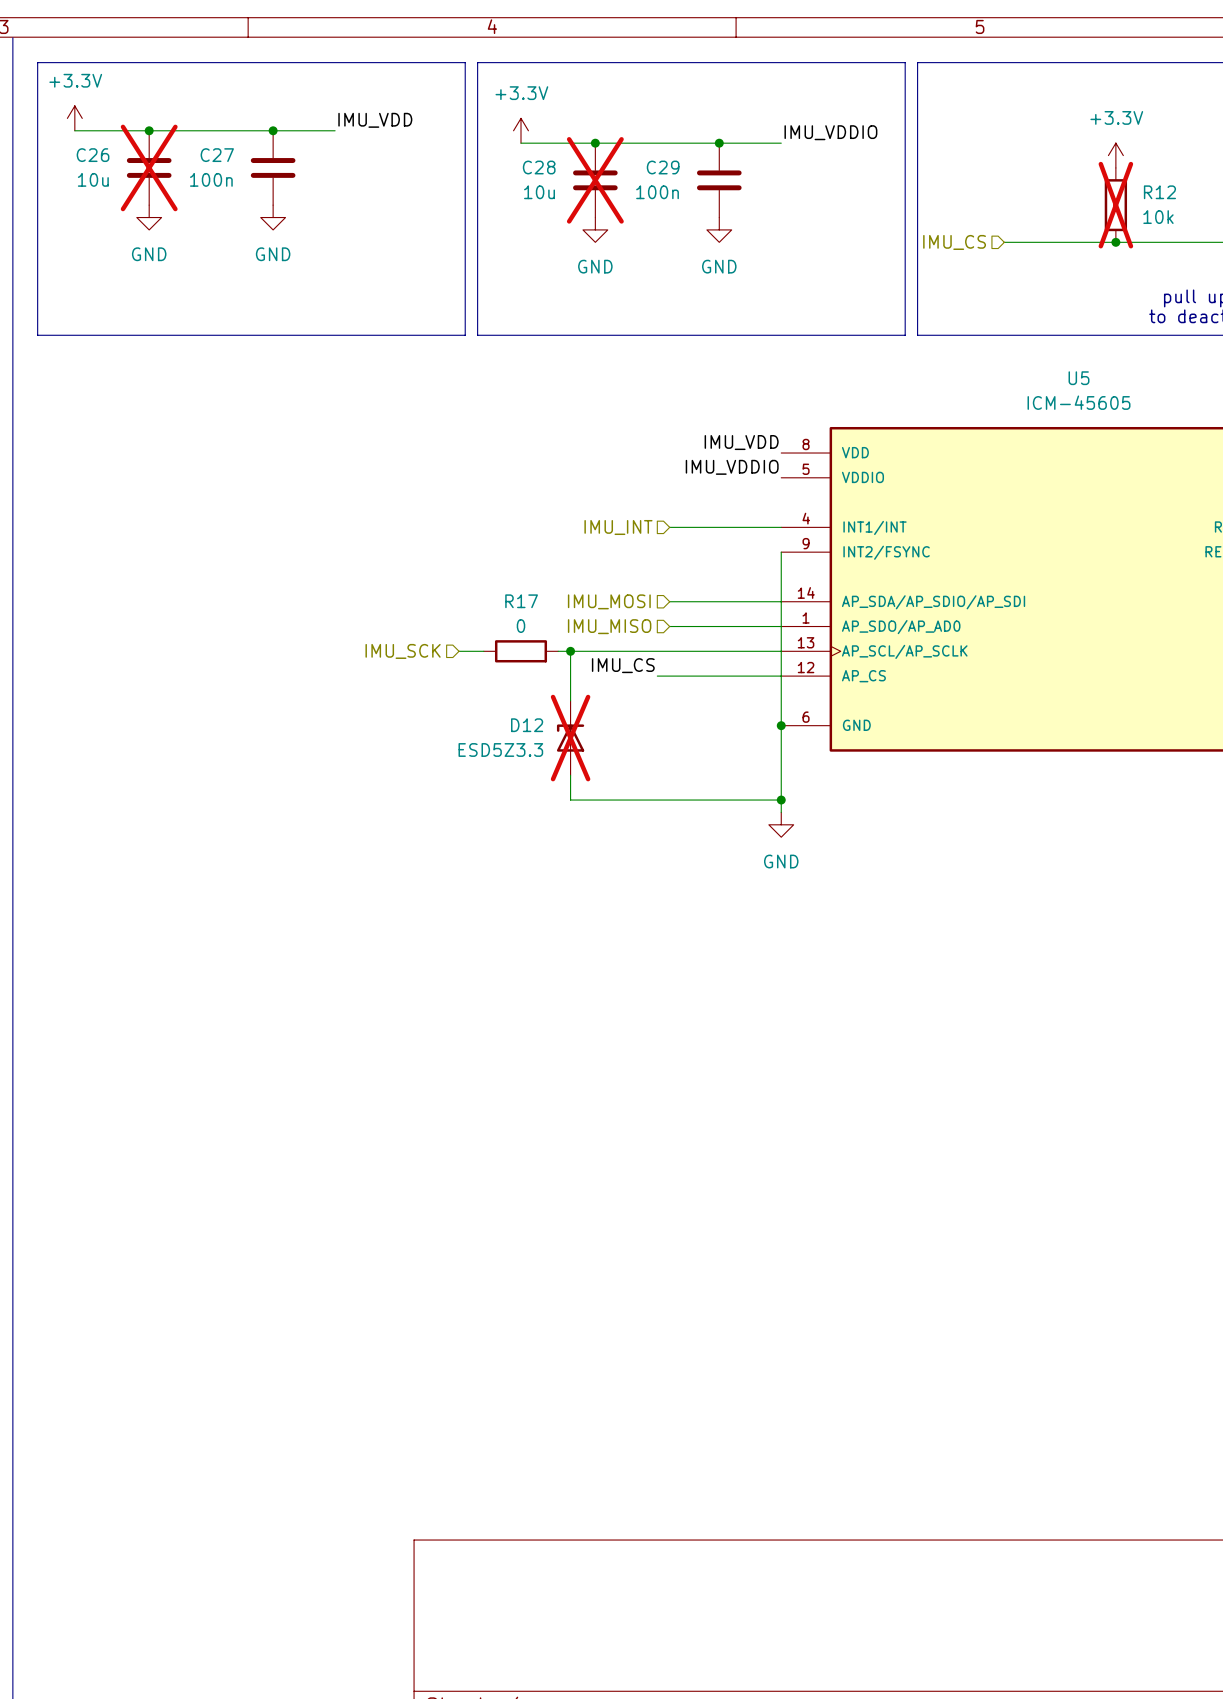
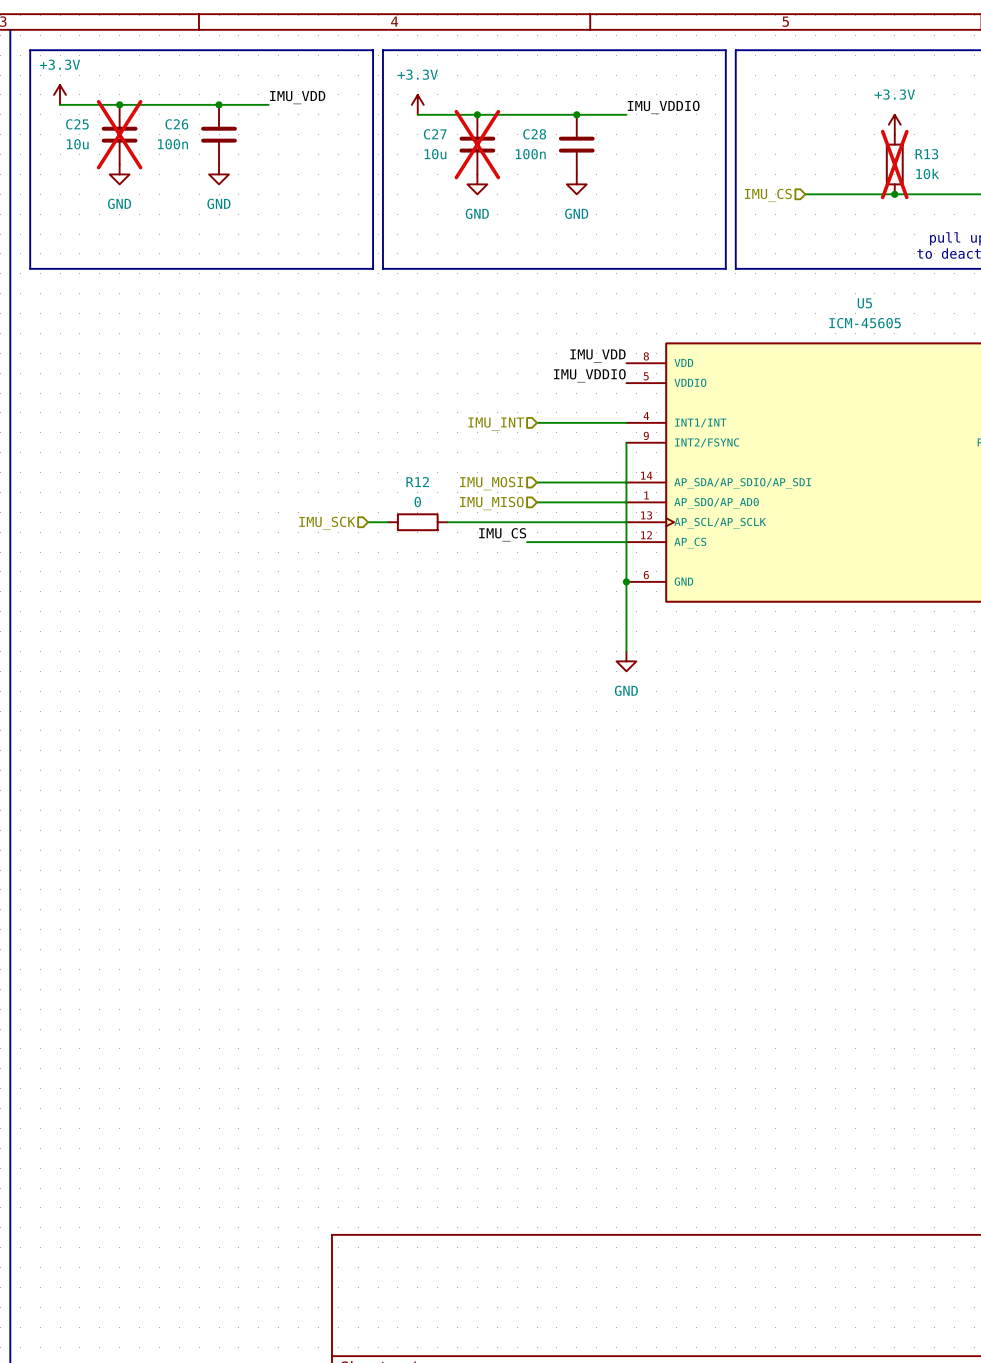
C26 name: C26 (93, 155) -> C25 (77, 124)
C27 name: C27 (217, 155) -> C26 (176, 124)
C28 name: C28 (539, 167) -> C27 (435, 134)
C29 name: C29 (663, 167) -> C28 (534, 134)
R12 name: R12 (1159, 192) -> R13 (926, 154)
R17 name: R17 (521, 601) -> R12 (417, 482)
wire: (570, 651) (570, 700) -> none
junction: (570, 651) -> none
D12: ESD5Z3.3 (570, 738) -> none
wire: (570, 775) (570, 800) (781, 800) -> none
junction: (781, 800) -> none

